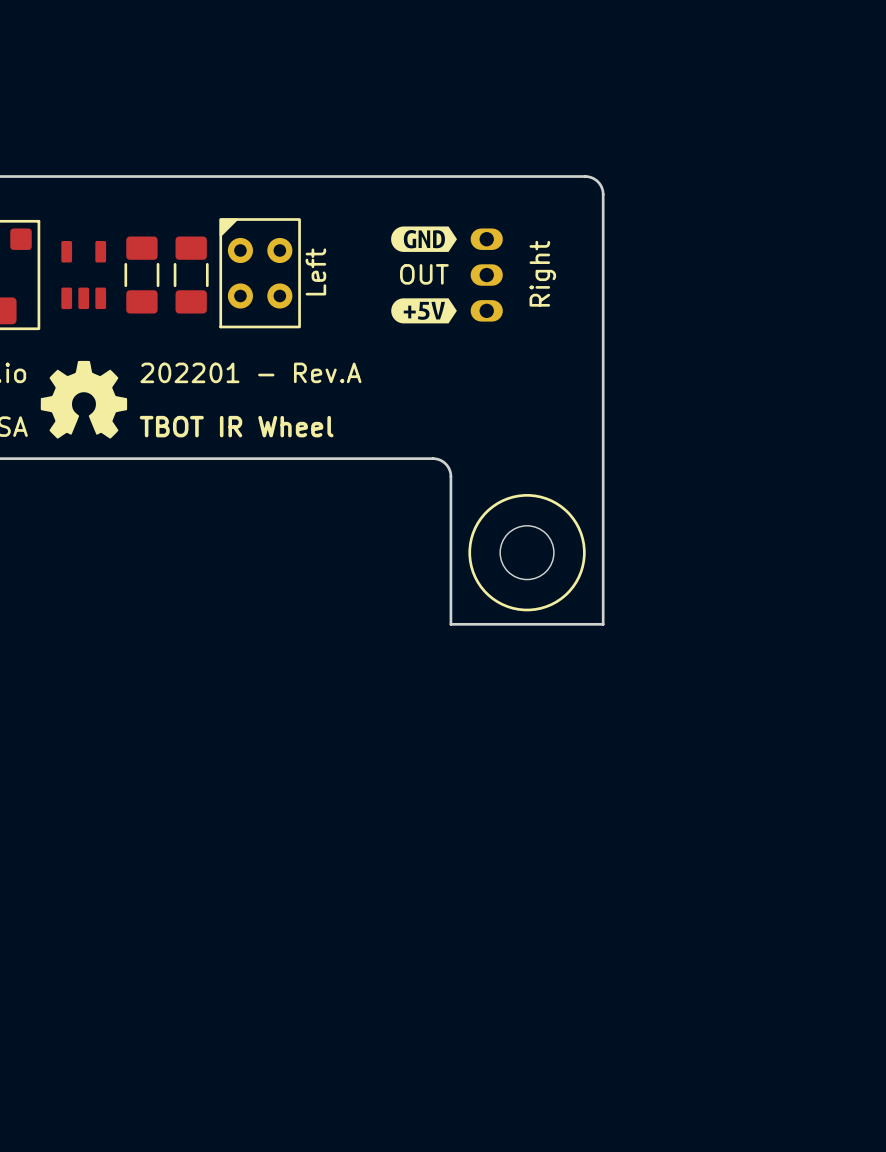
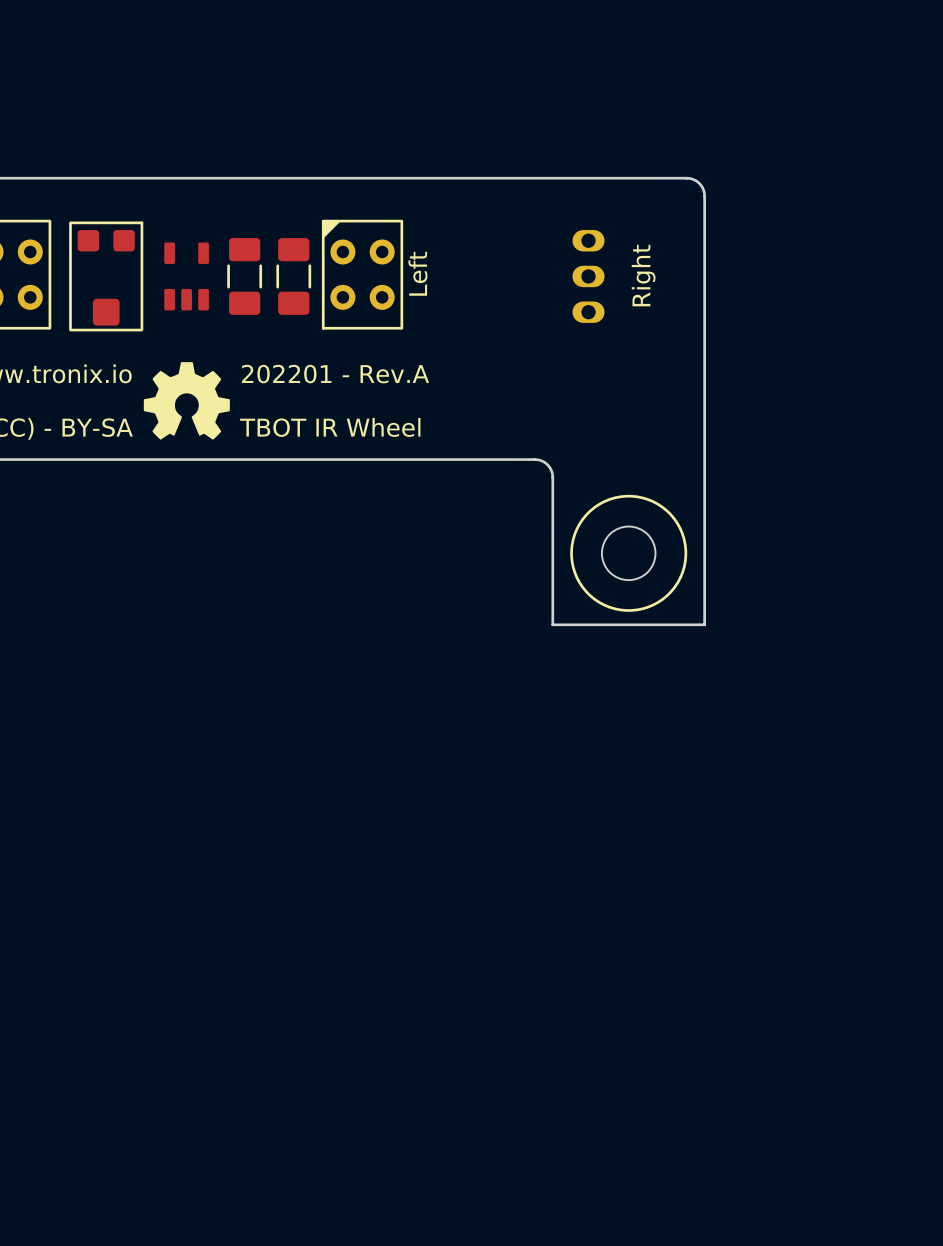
drawing: [391, 226, 458, 252] -> none
text: OUT (424, 274) -> none
drawing: [391, 298, 457, 324] -> none

